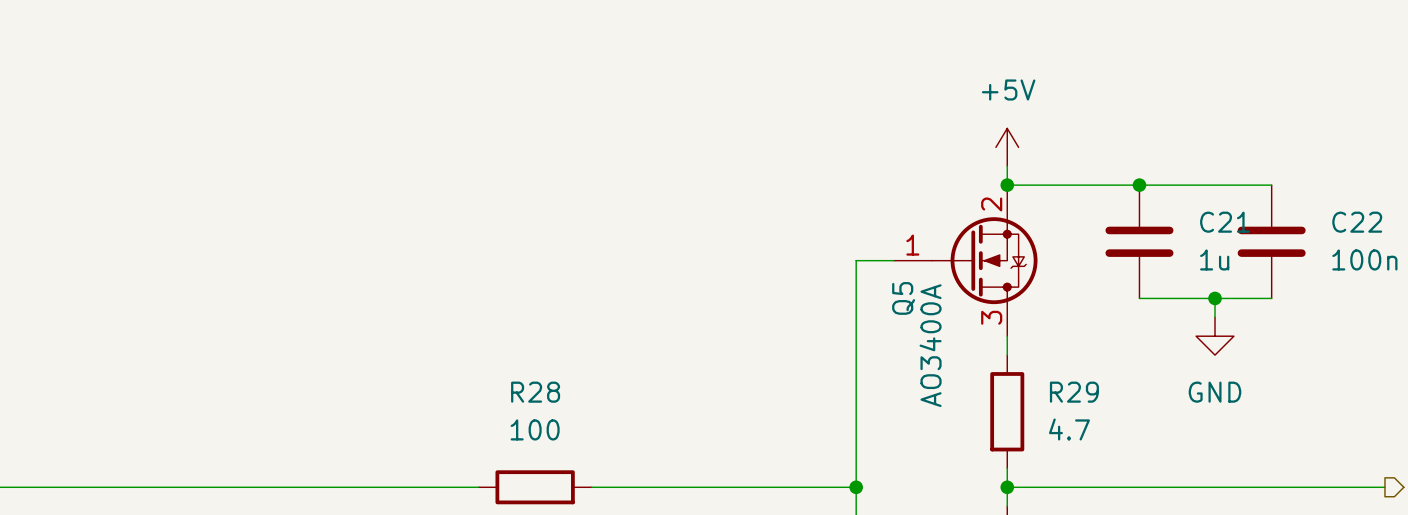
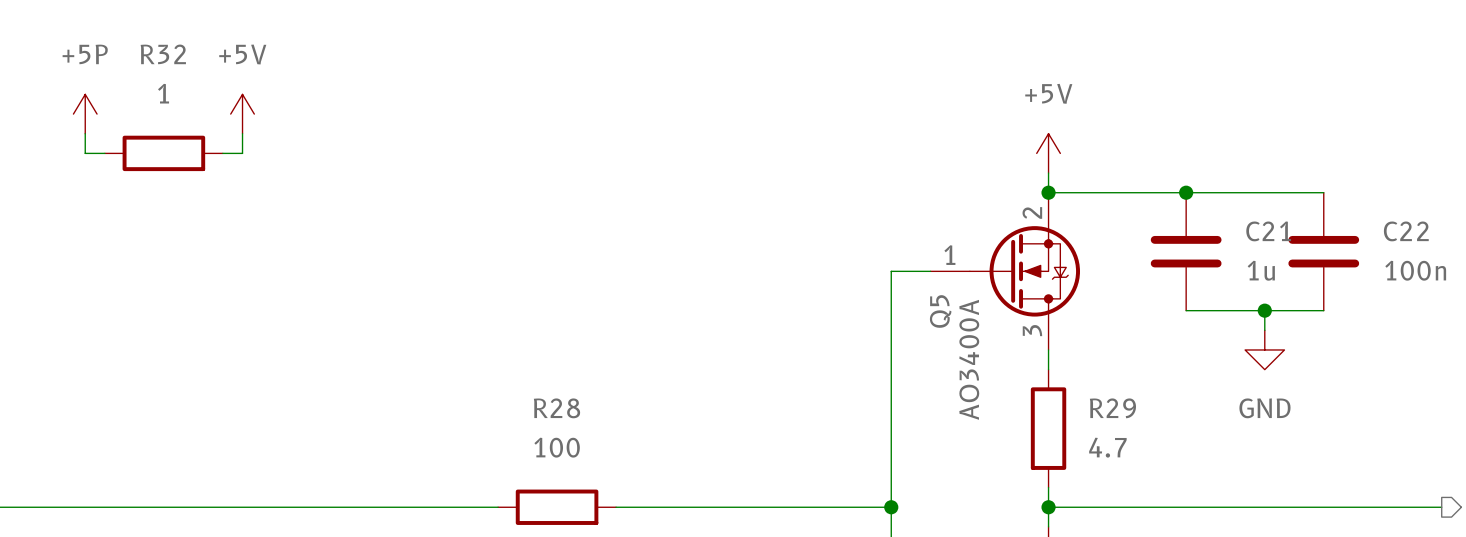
power symbol: none -> +5P (85, 114)
power symbol: none -> +5V (242, 114)
wire: none -> (85, 133) (85, 153) (104, 153)
wire: none -> (242, 133) (242, 153) (222, 153)
R32: none -> 1 (163, 153)

